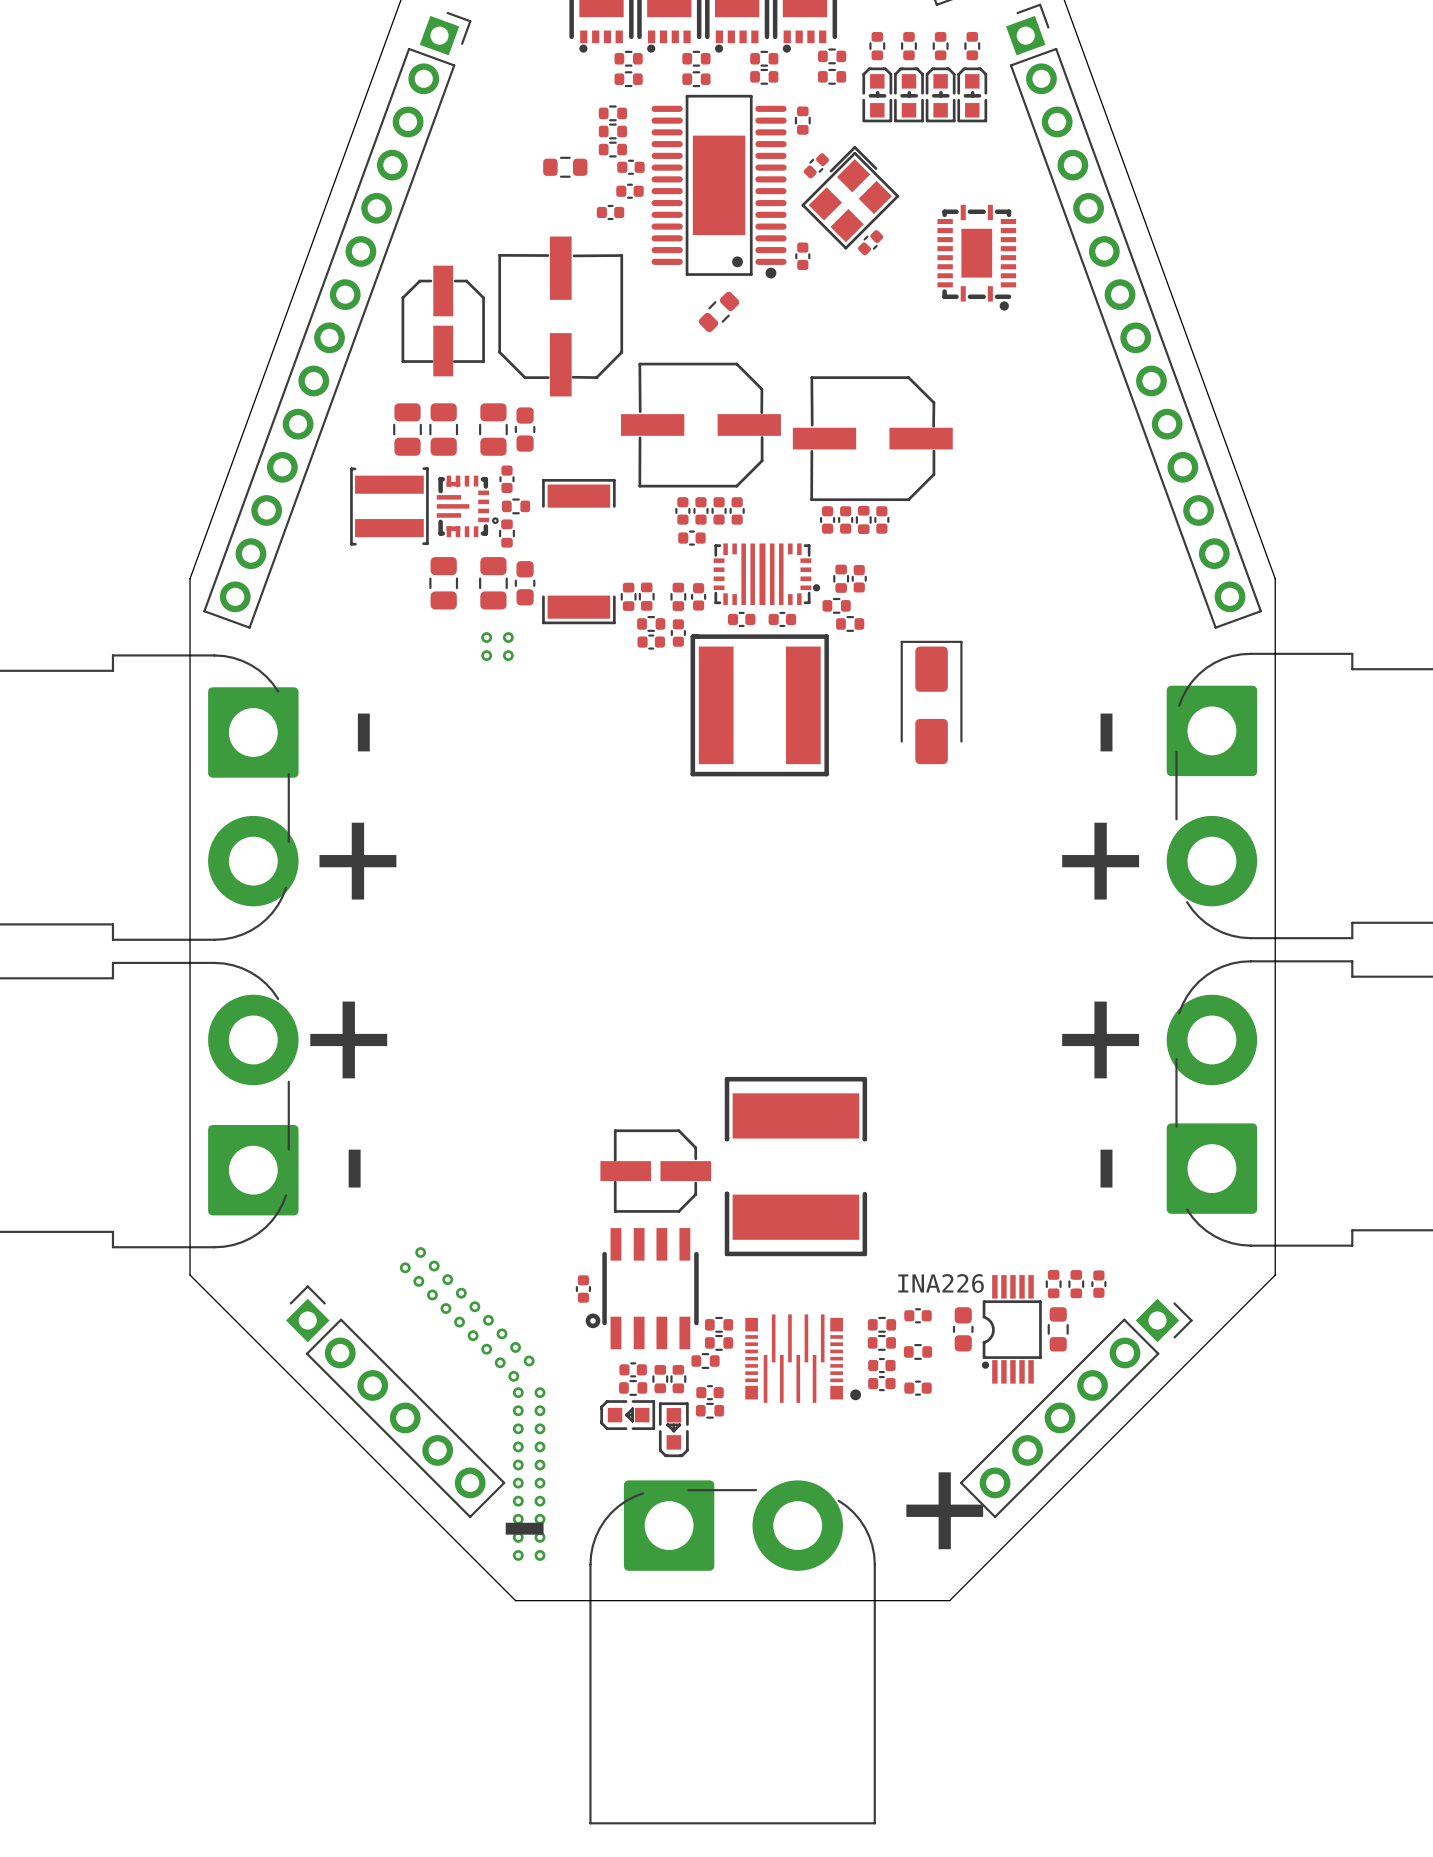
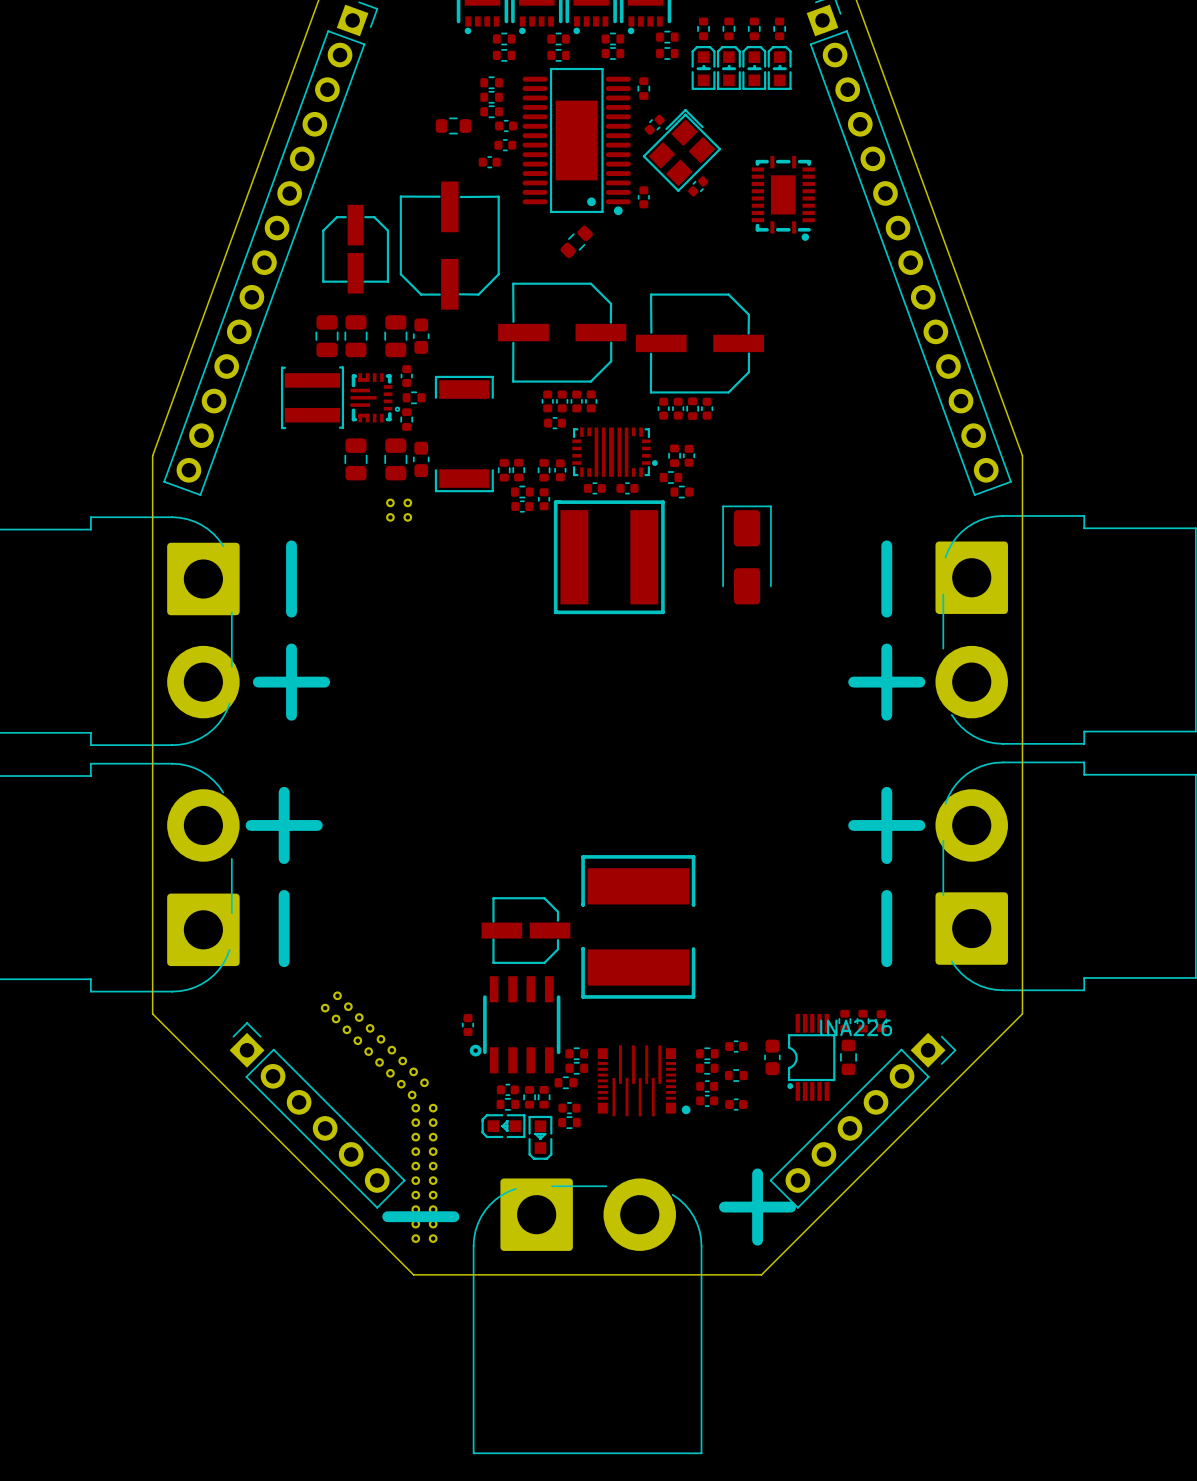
text position: INA226 (941, 1283) -> INA226 (856, 1027)

